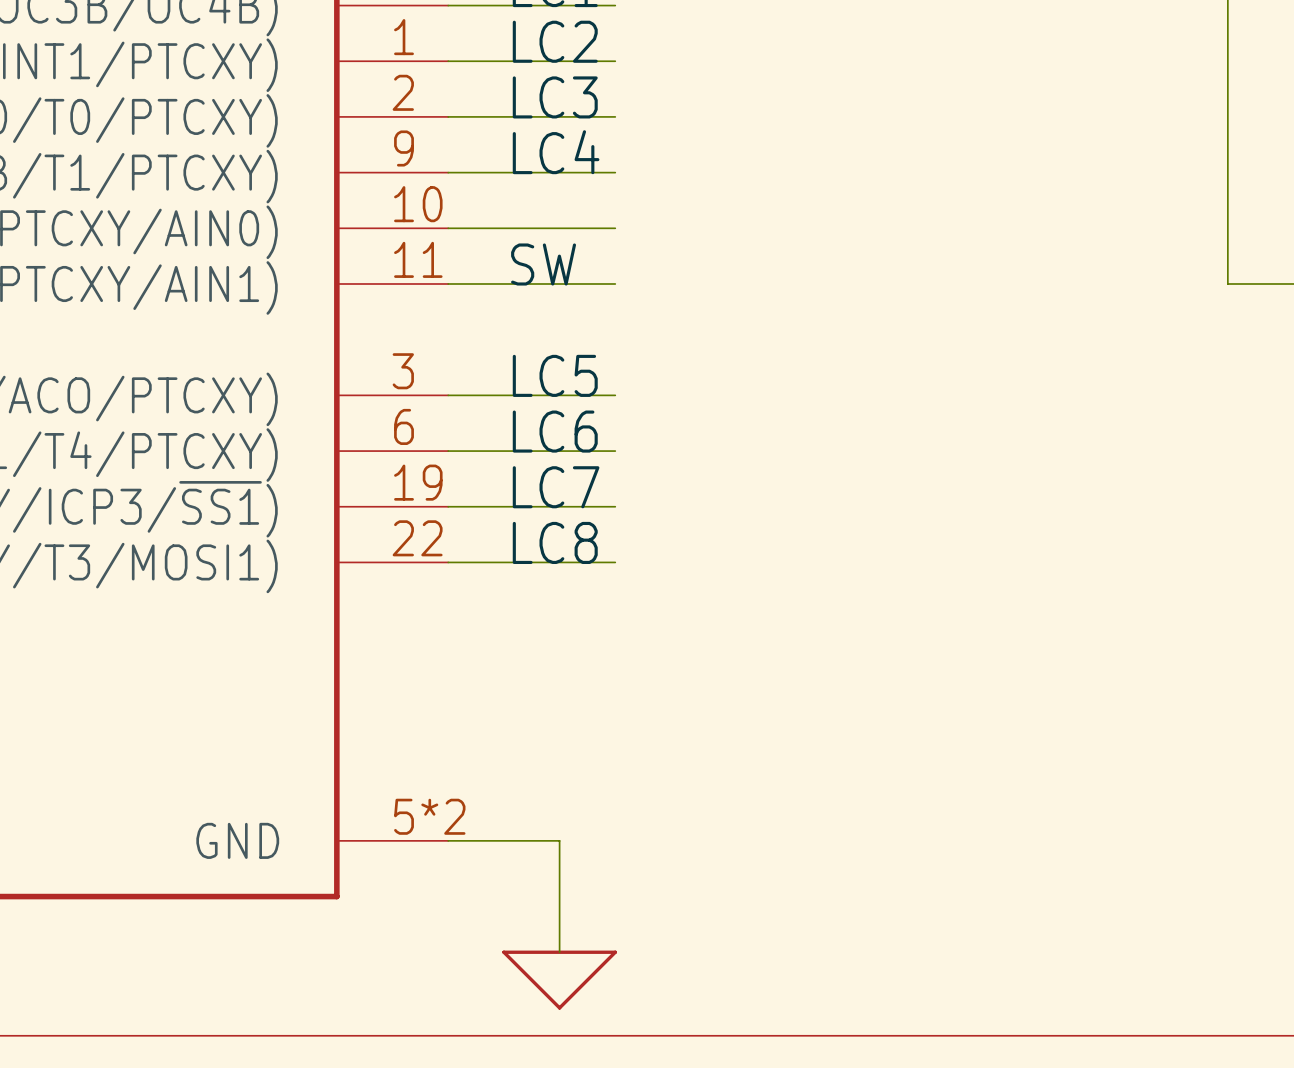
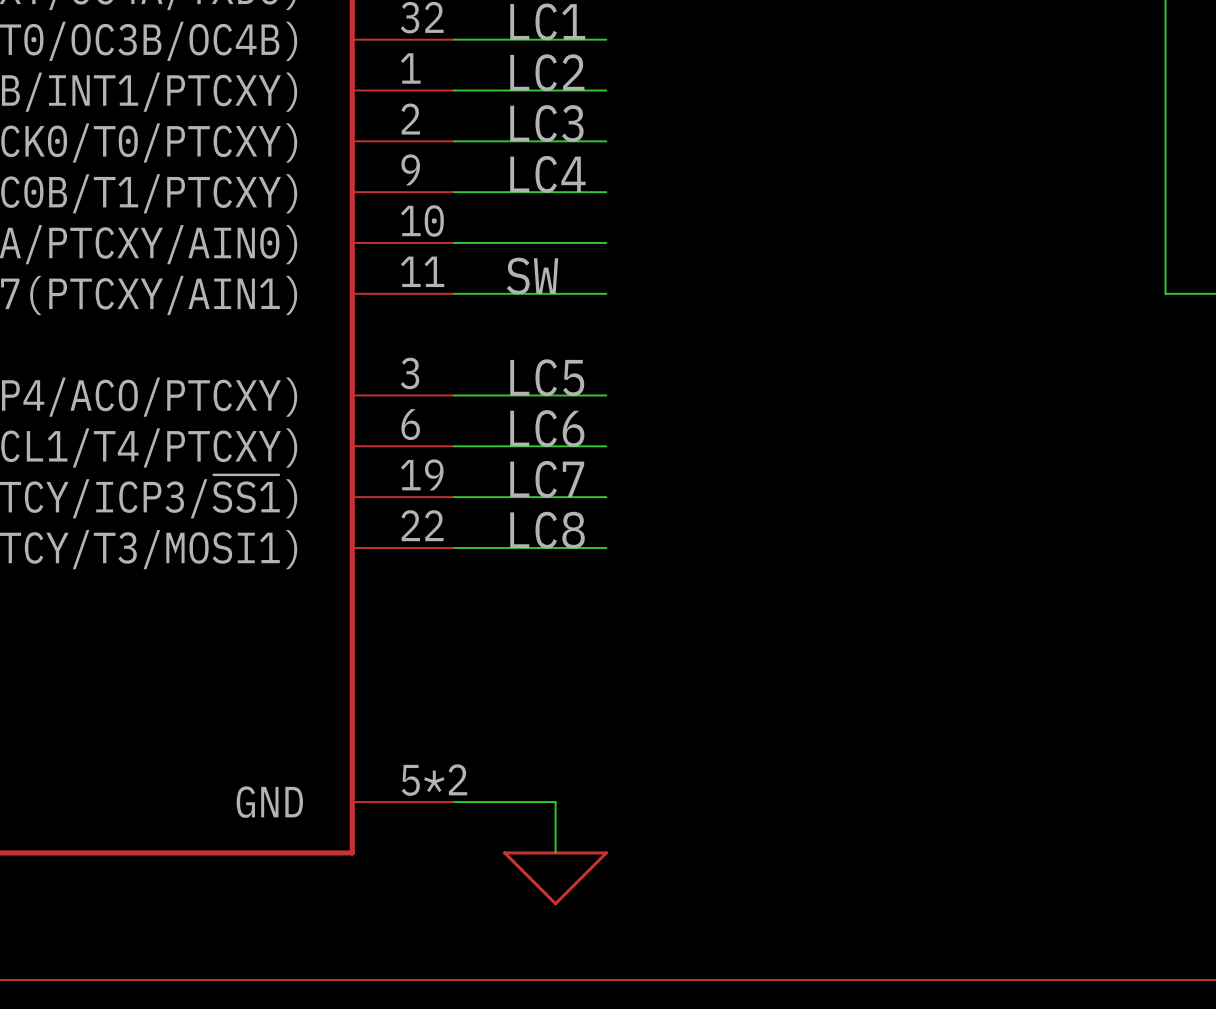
wire: (559, 896) (559, 952) -> none
power symbol position: (559, 980) -> (555, 878)

